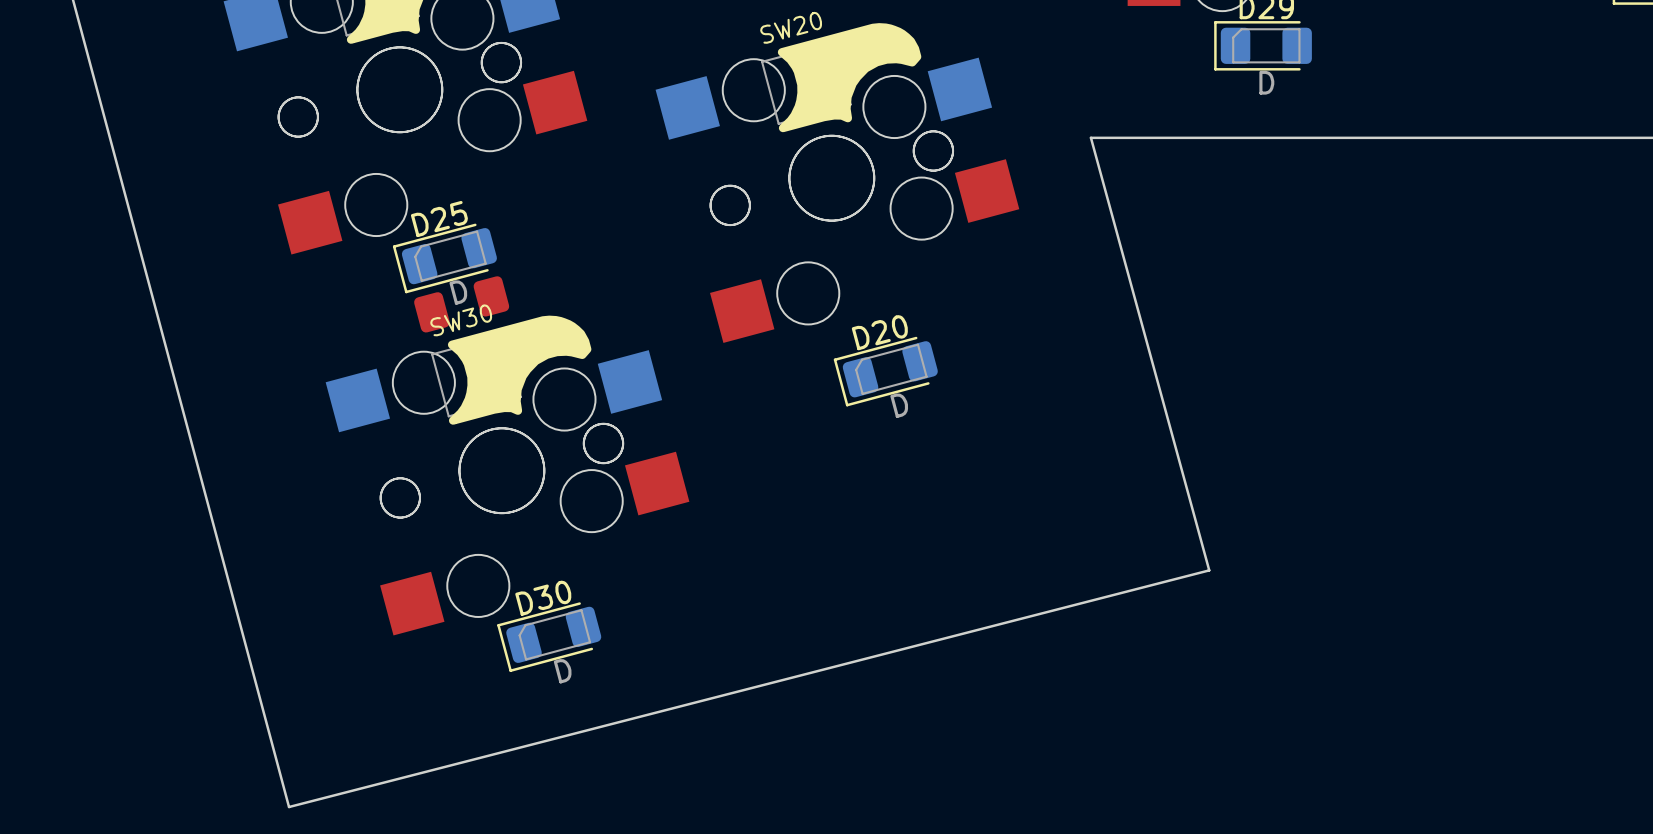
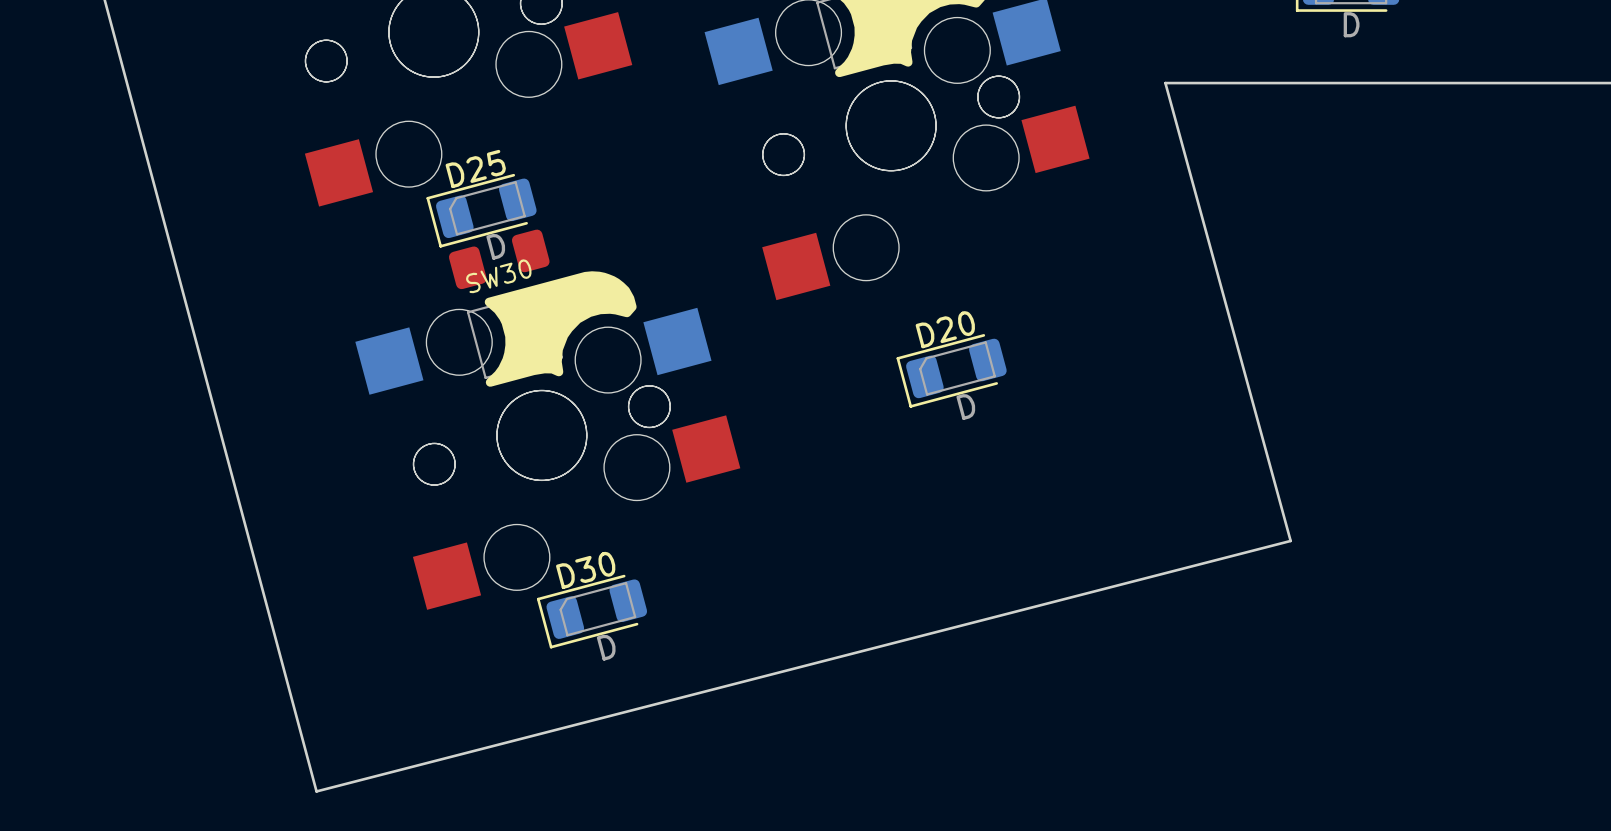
D20 position: (885, 371) -> (951, 370)

